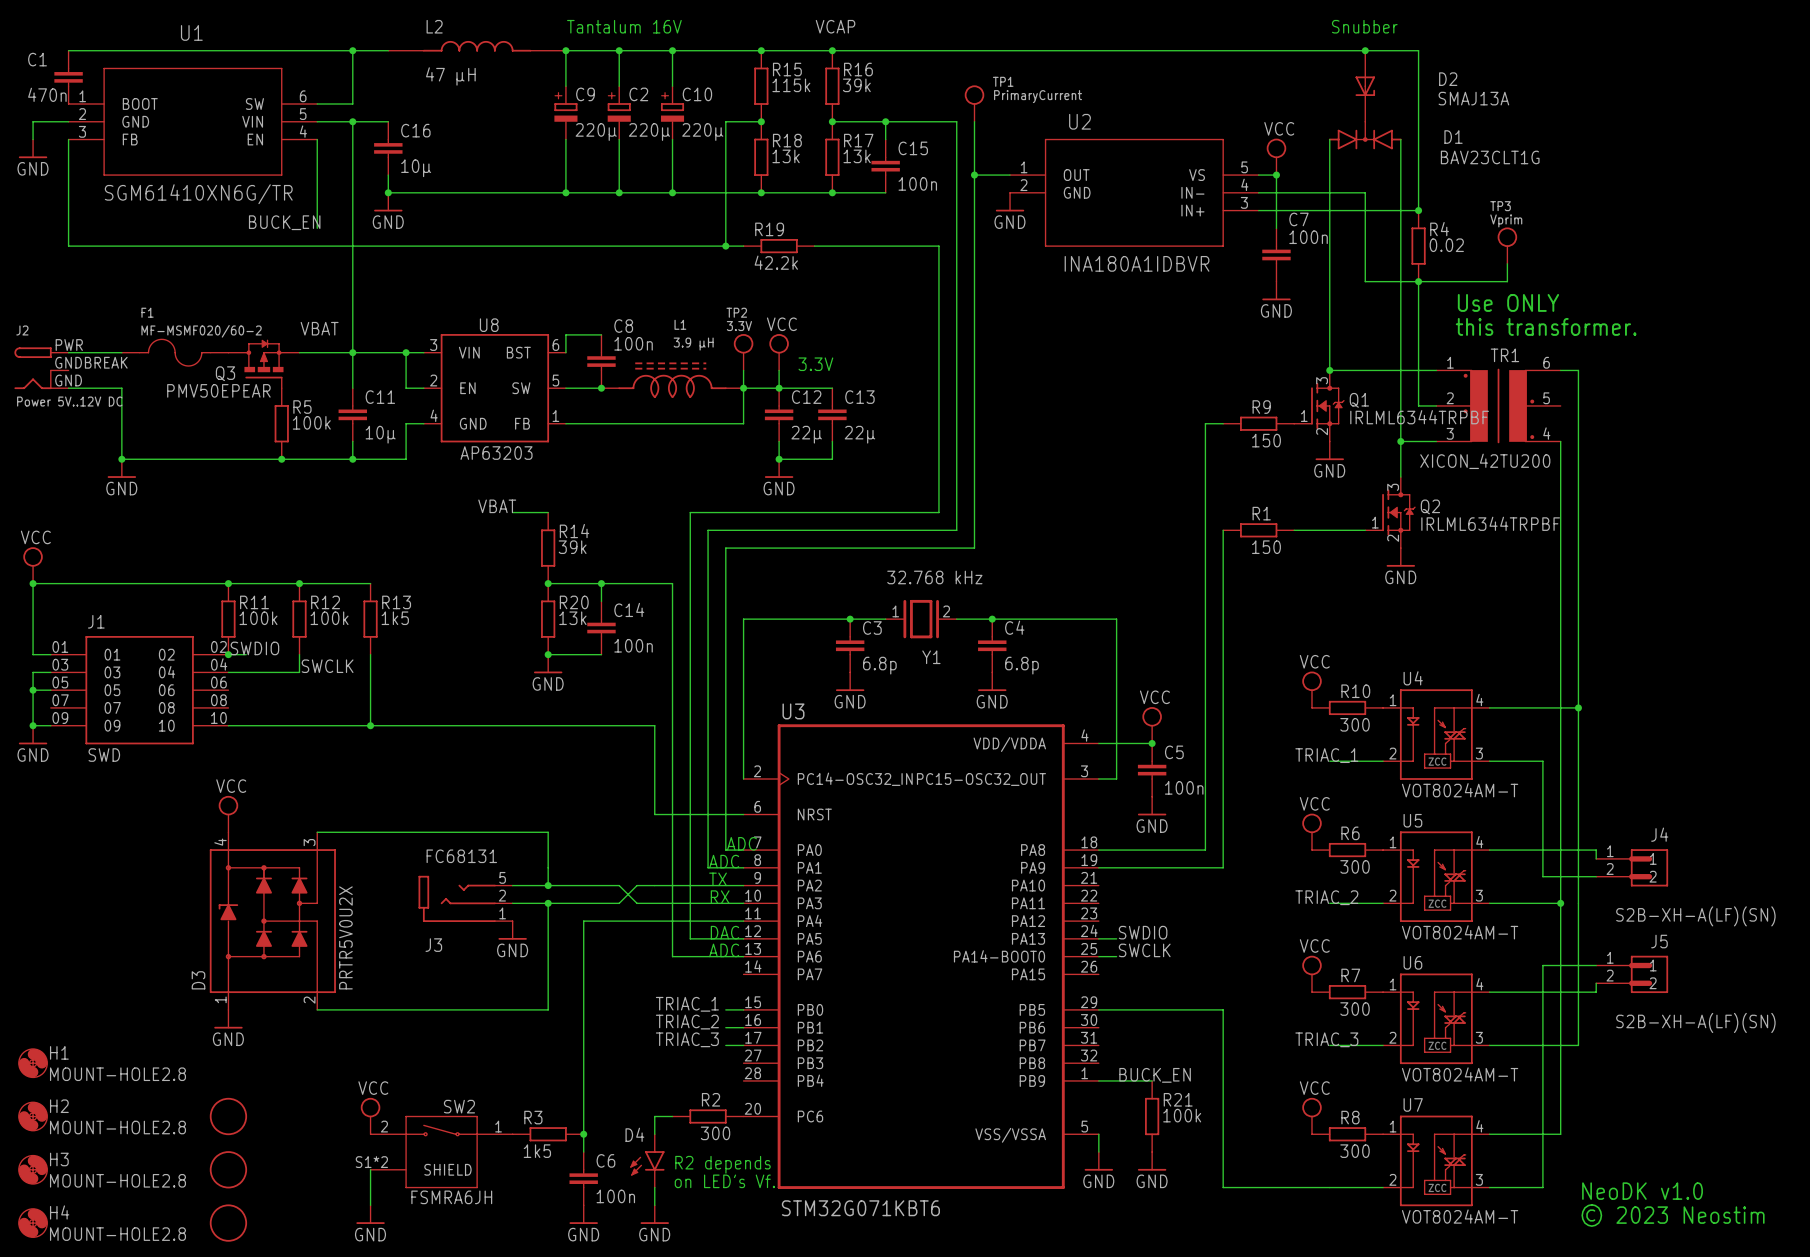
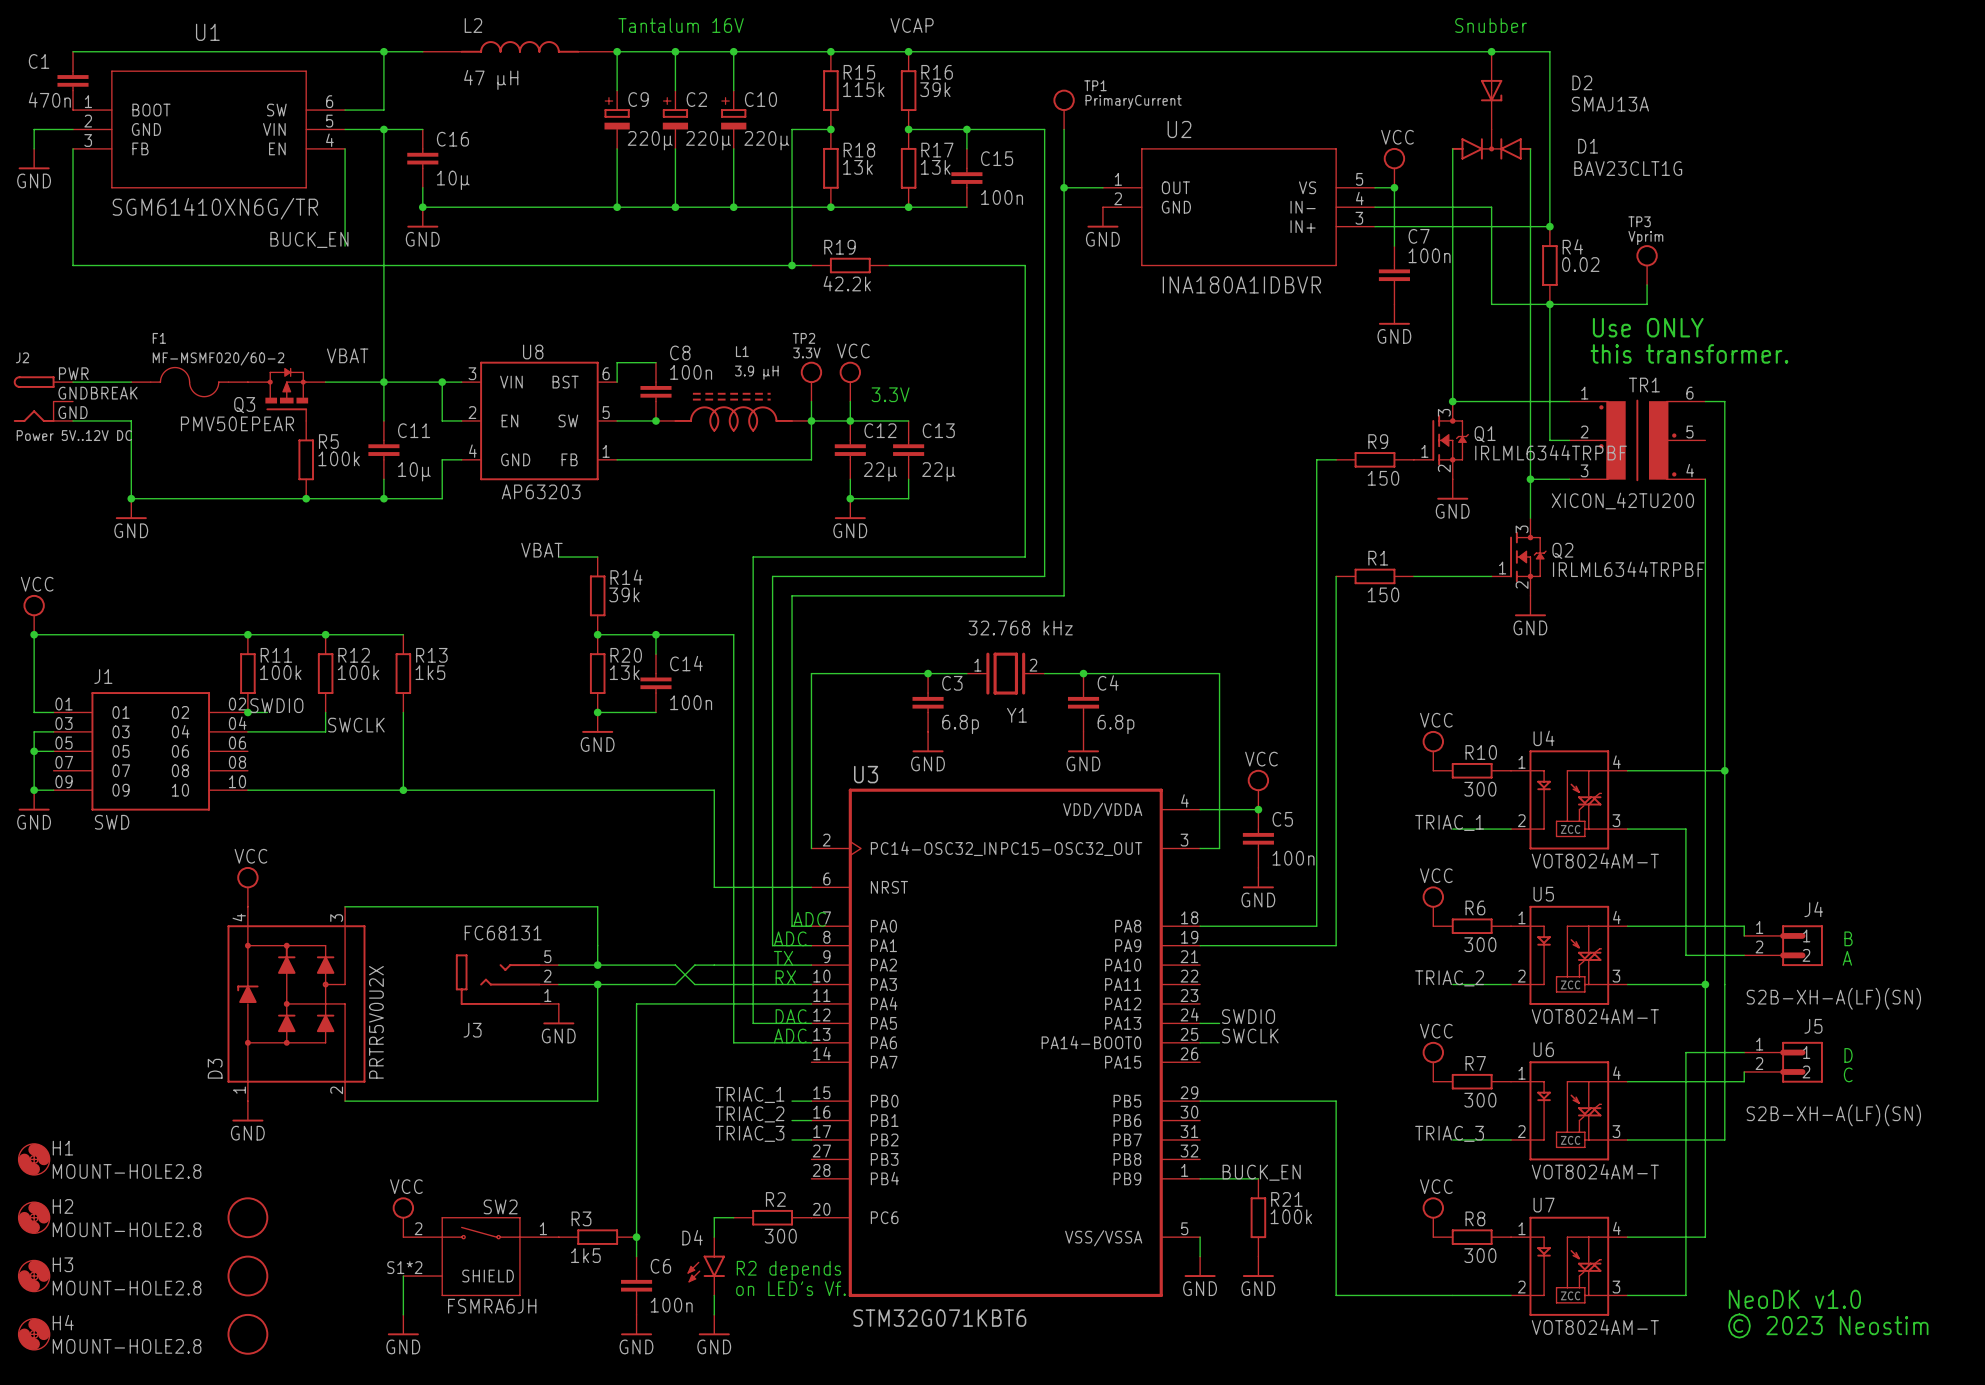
text: none -> B (1848, 938)
text: none -> A (1847, 958)
J4 value position: S2B-XH-A(LF)(SN) (1695, 916) -> S2B-XH-A(LF)(SN) (1833, 998)
text: none -> D (1848, 1055)
text: none -> C (1848, 1074)
J5 value position: S2B-XH-A(LF)(SN) (1695, 1022) -> S2B-XH-A(LF)(SN) (1833, 1115)

